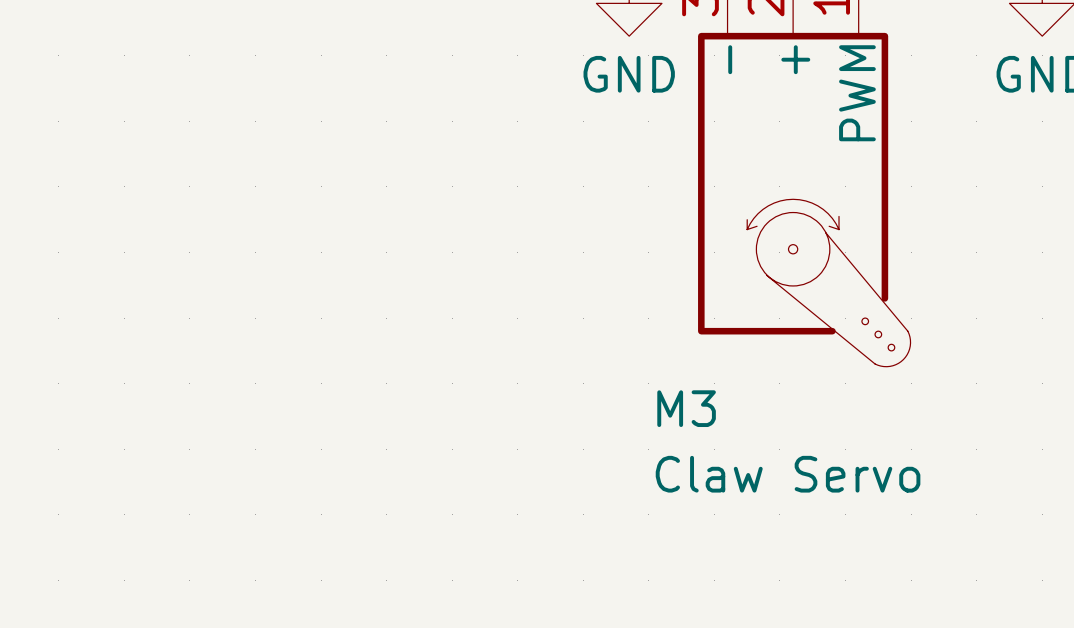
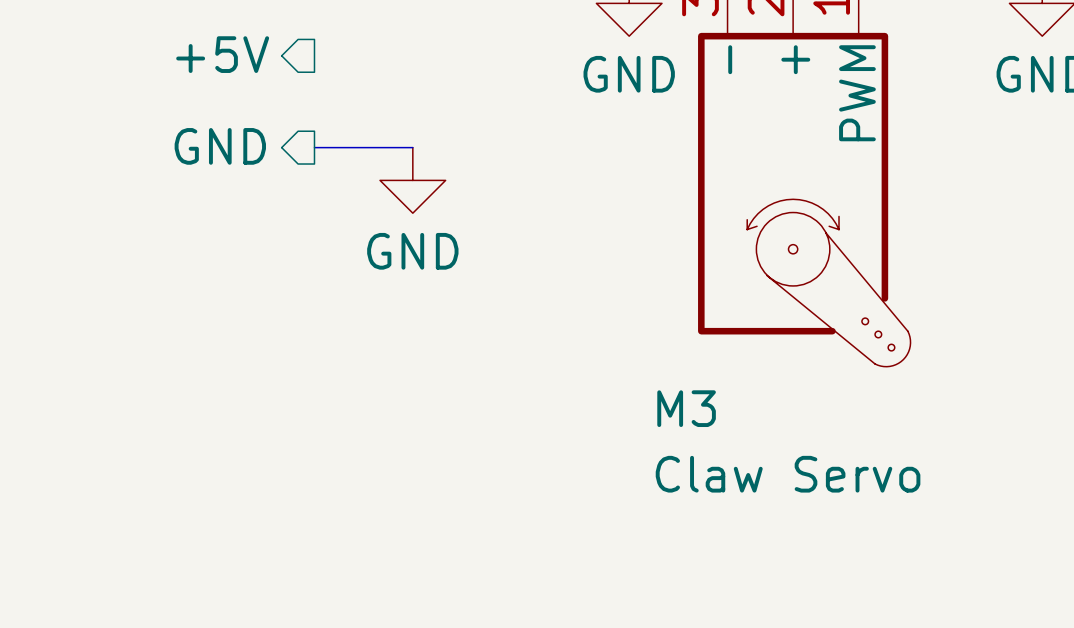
sheet pin: none -> +5V (222, 54)
sheet pin: none -> GND (220, 146)
bus: none -> (314, 147) (412, 147)
power symbol: none -> GND (412, 180)

